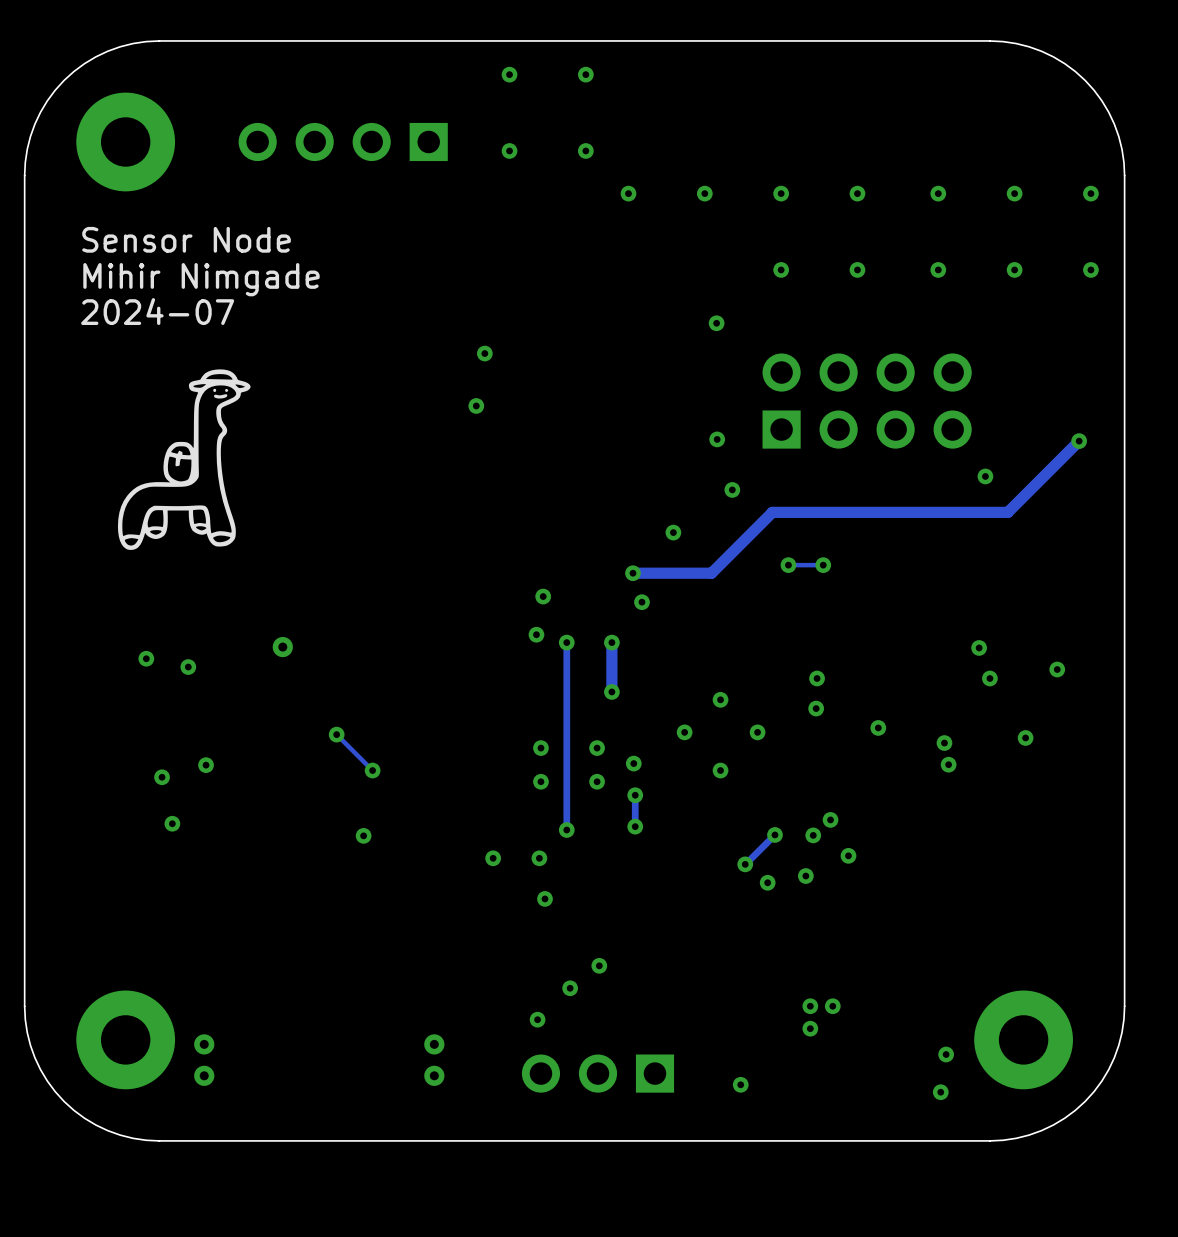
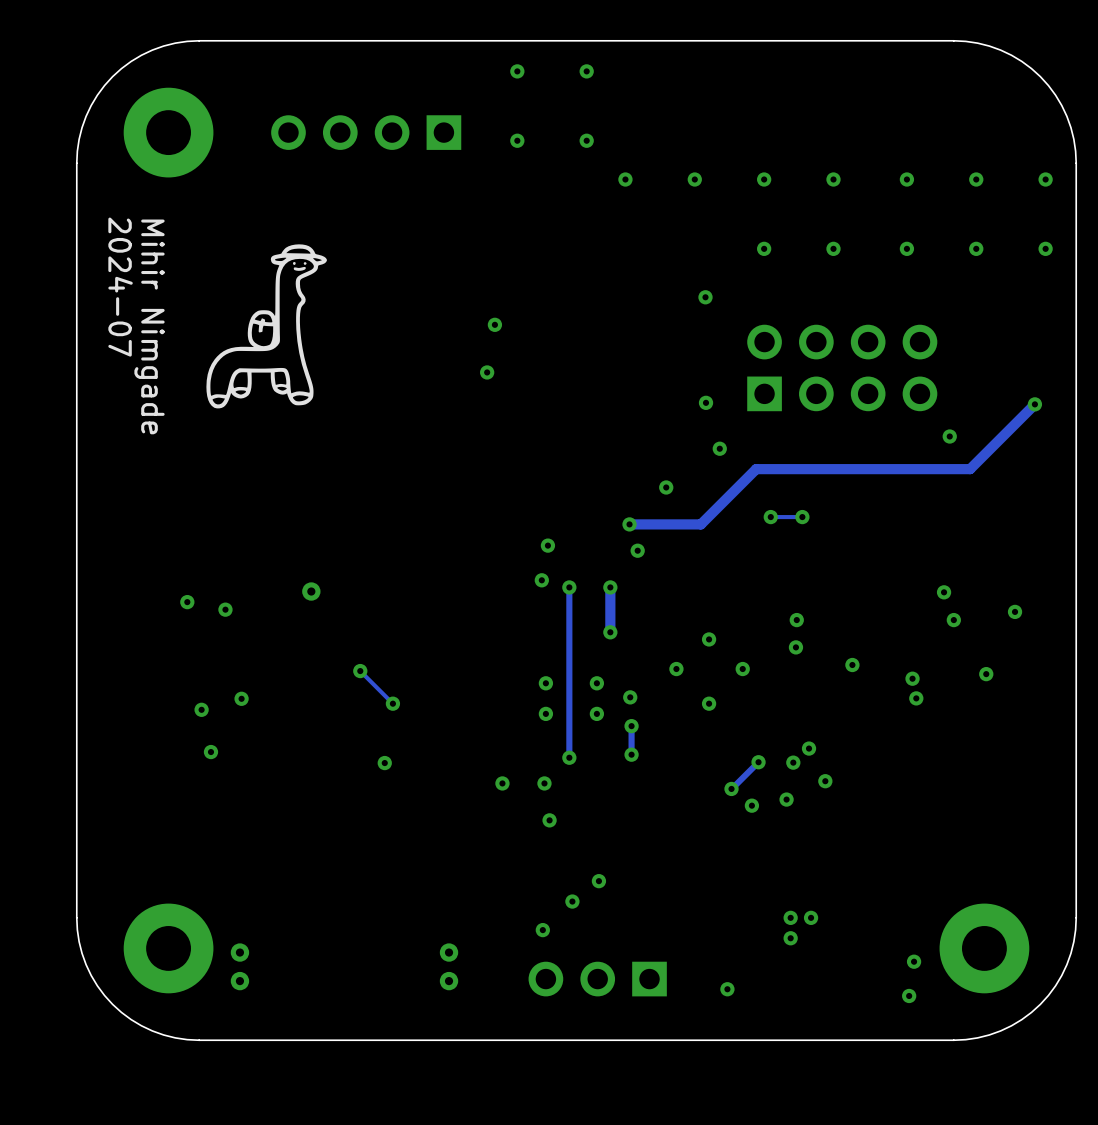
text: Sensor Node (186, 239) -> none
text rotation: 0° (201, 279) -> 90° clockwise (149, 326)
text rotation: 0° (157, 311) -> 90° clockwise (120, 287)
drawing position: (184, 459) -> (266, 326)

